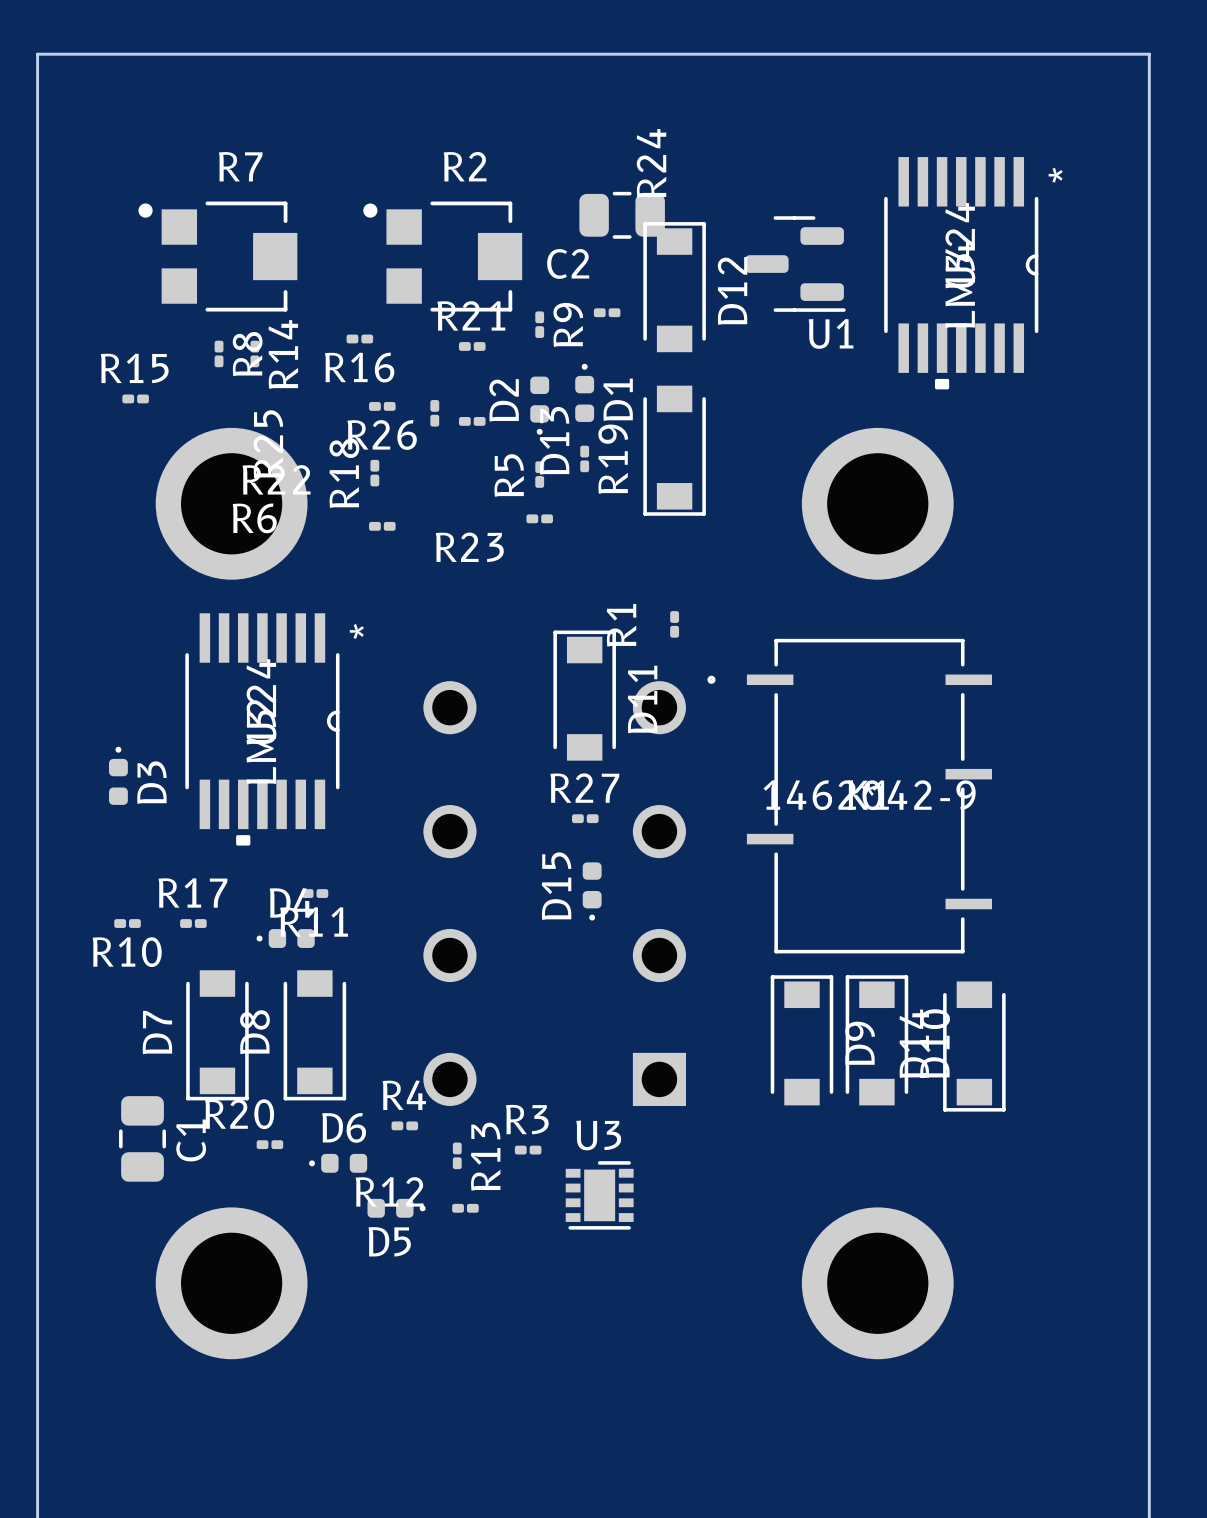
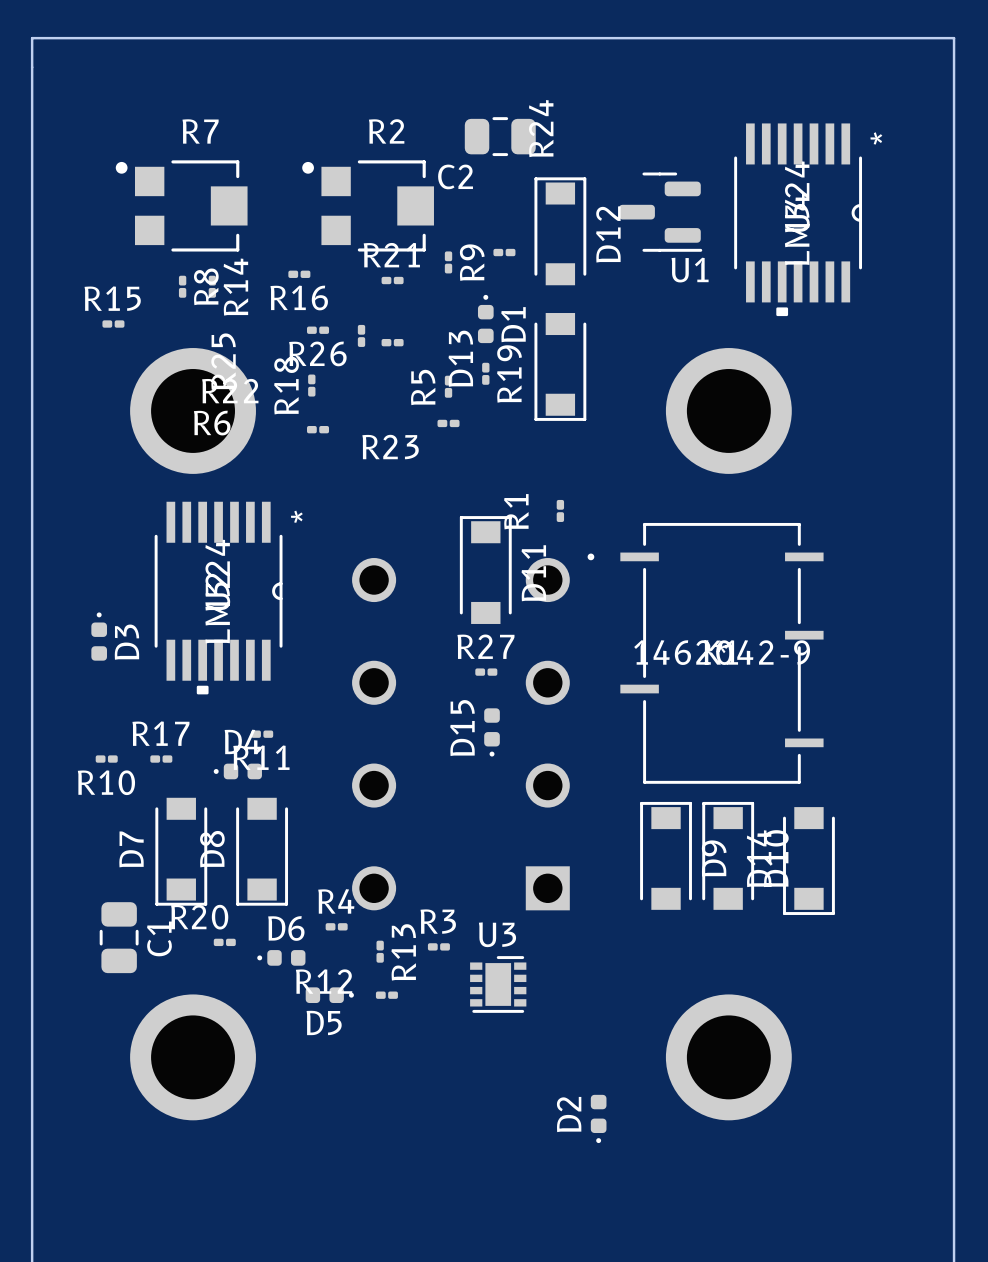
C2 position: (622, 215) -> (500, 136)
D2 position: (539, 405) -> (598, 1118)

